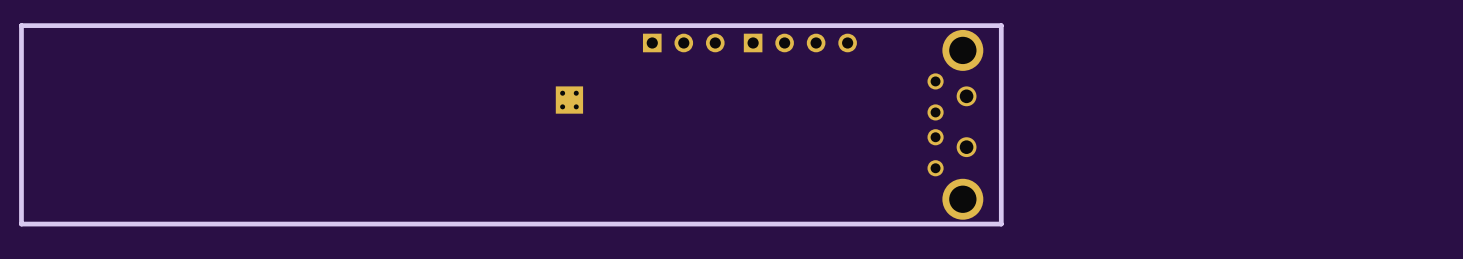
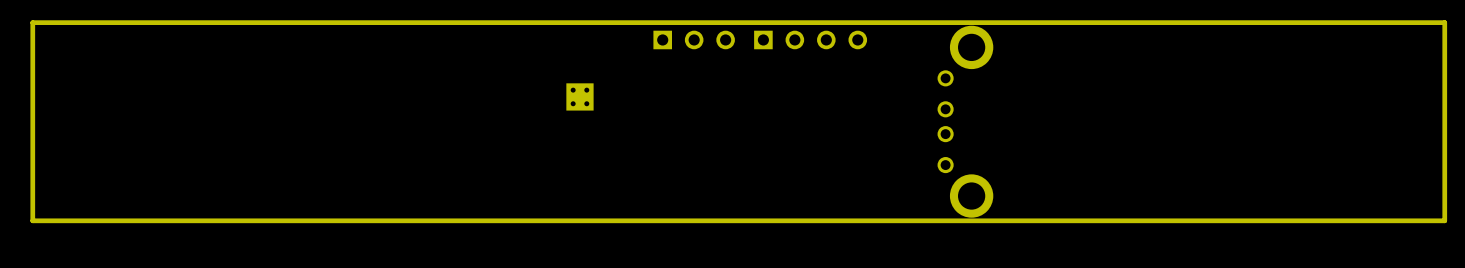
board edge: (1001, 25) (1001, 224) -> (1011, 22) (1444, 22) (1444, 220) (1011, 220)
part footprint: [927, 29, 984, 220] -> [937, 25, 994, 218]

